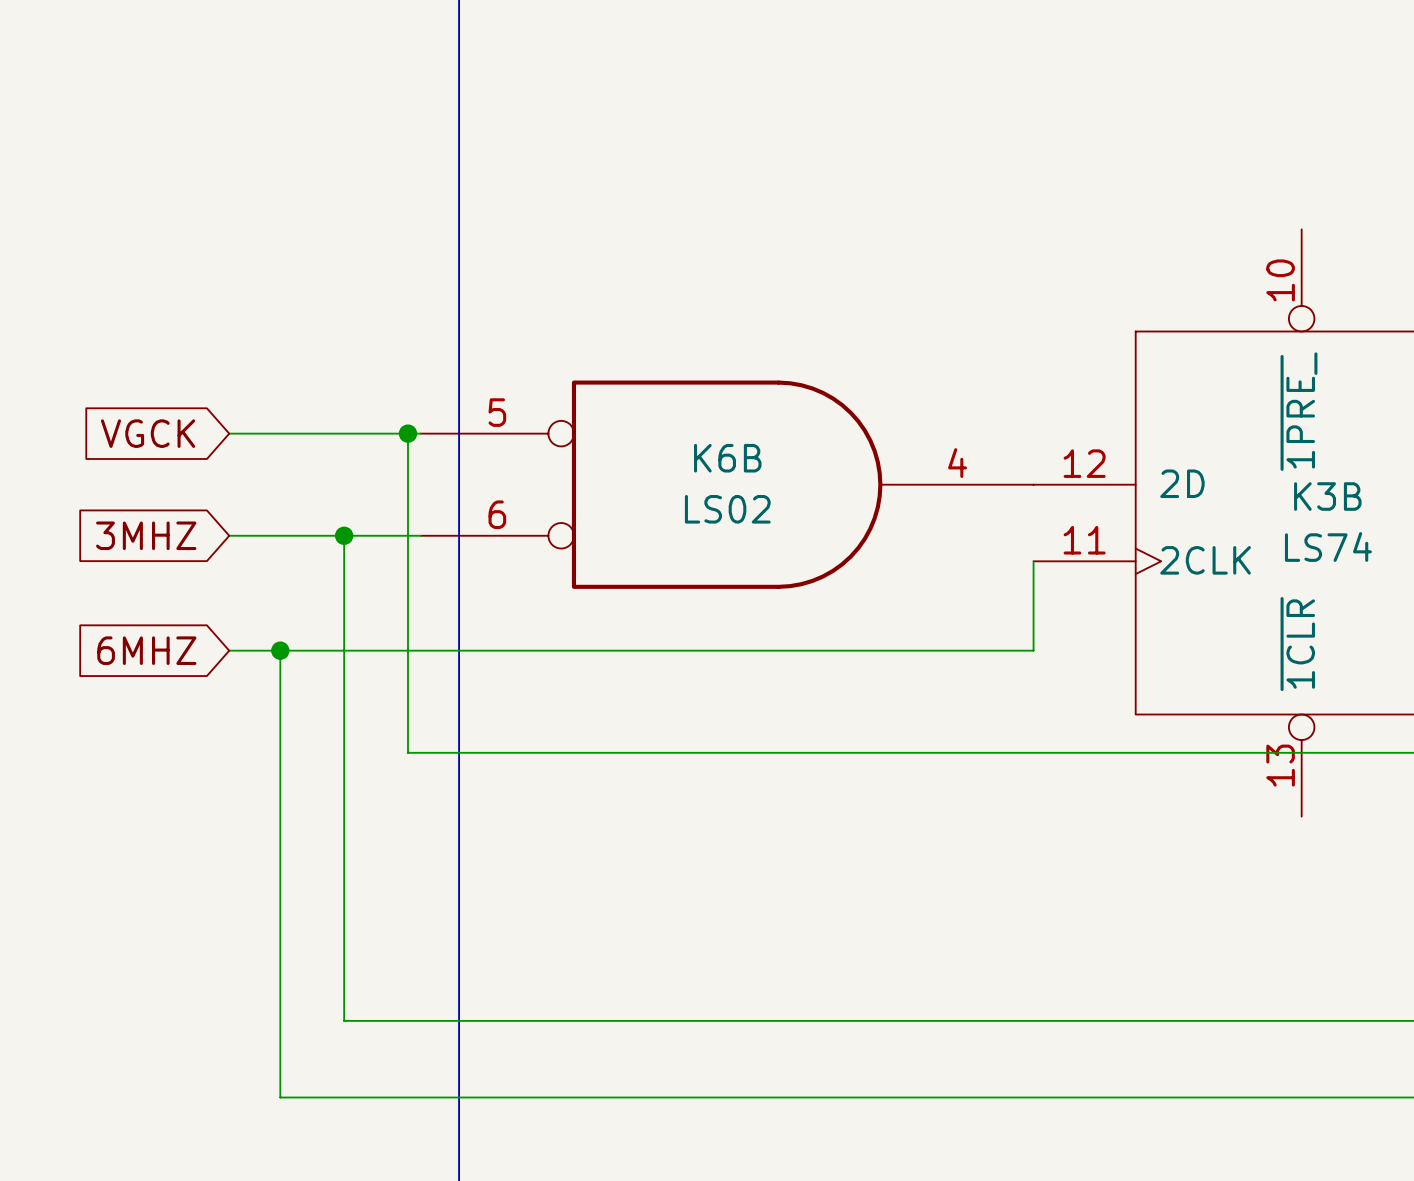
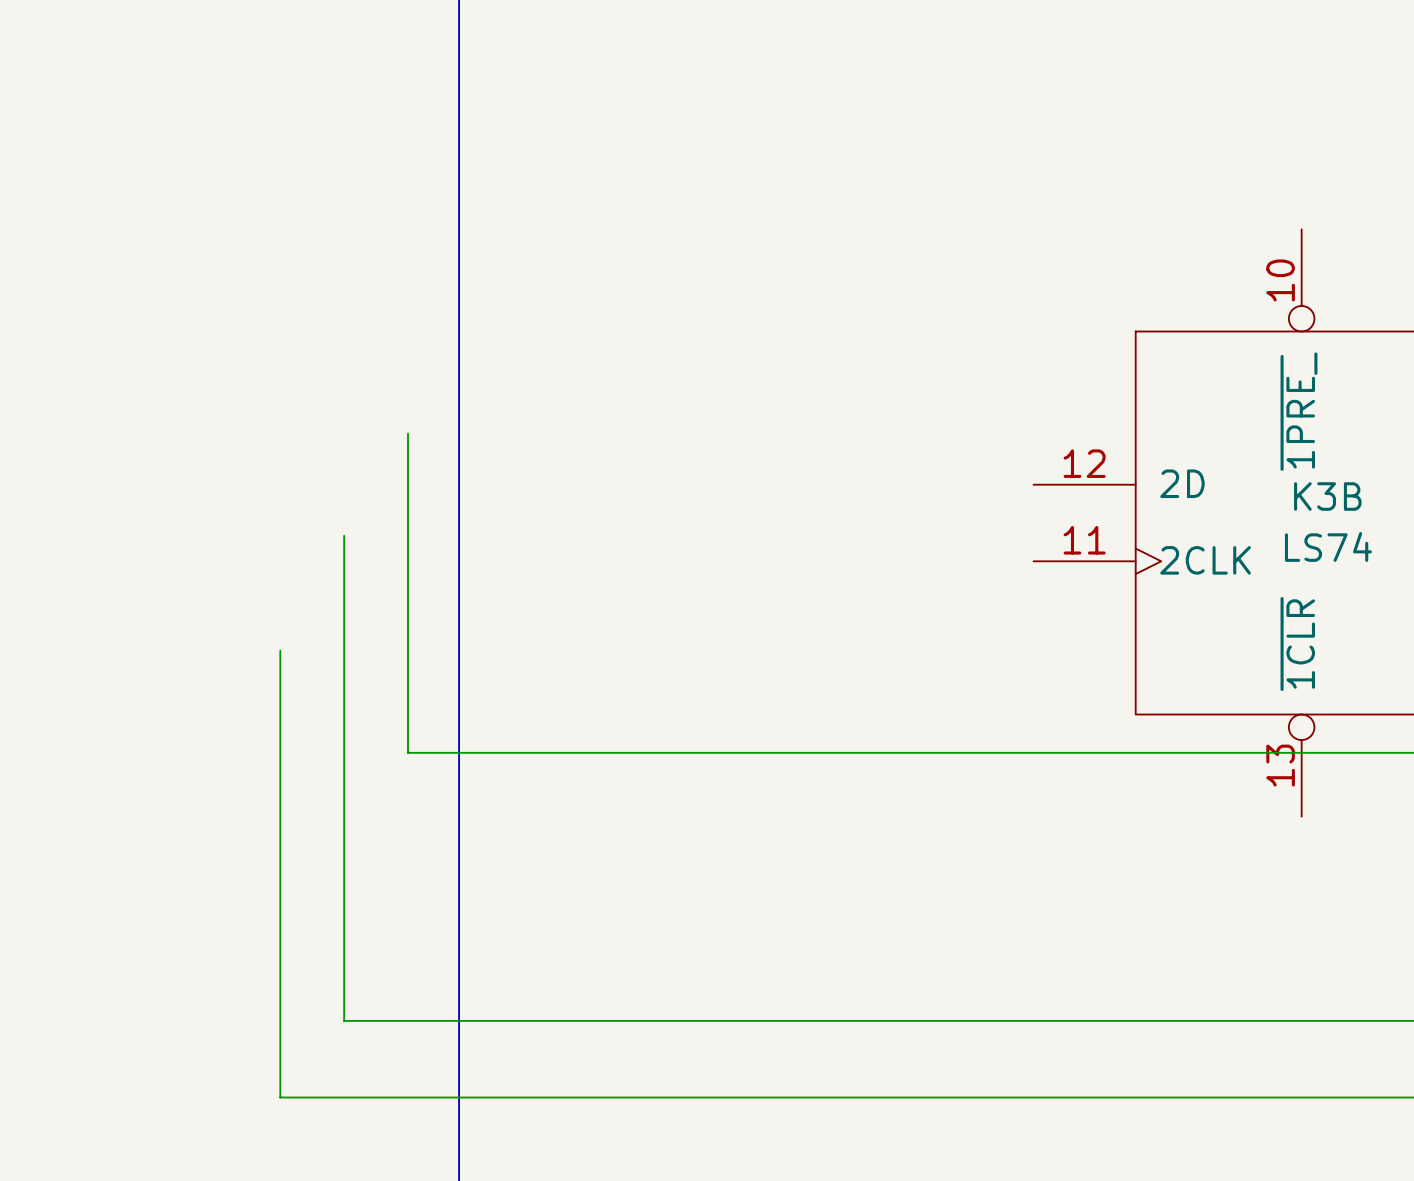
global label: VGCK (148, 433) -> none
wire: (229, 433) (420, 433) -> none
junction: (407, 433) -> none
K6B: LS02 (727, 484) -> none
global label: 3MHZ (146, 535) -> none
wire: (229, 535) (420, 535) -> none
junction: (344, 535) -> none
wire: (1033, 561) (1033, 650) (229, 650) -> none
global label: 6MHZ (146, 650) -> none
junction: (280, 650) -> none

